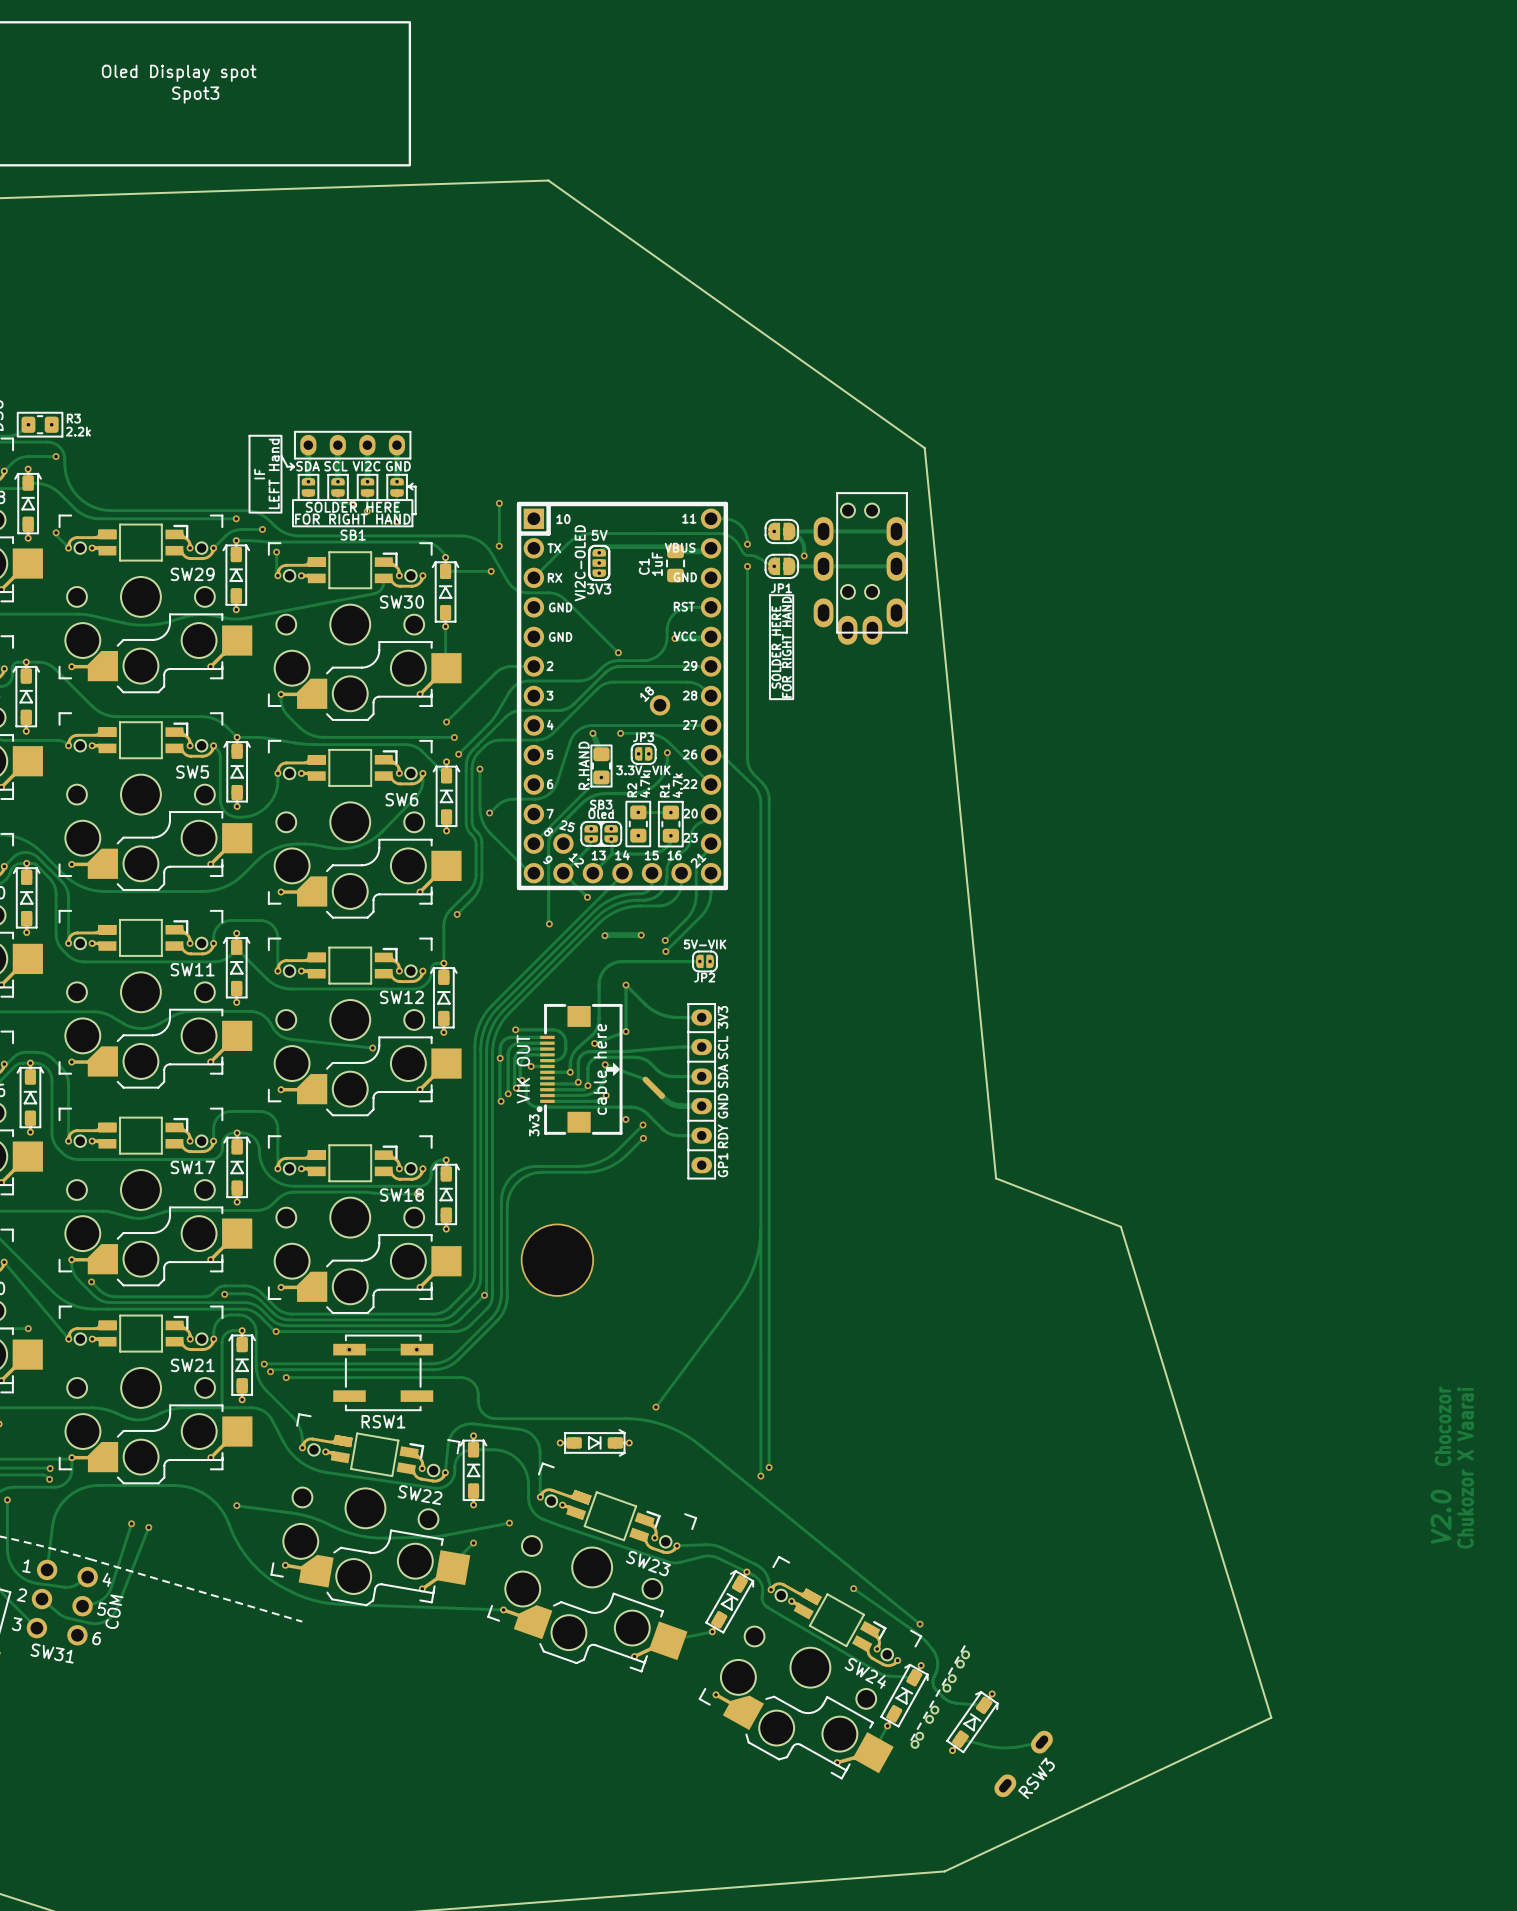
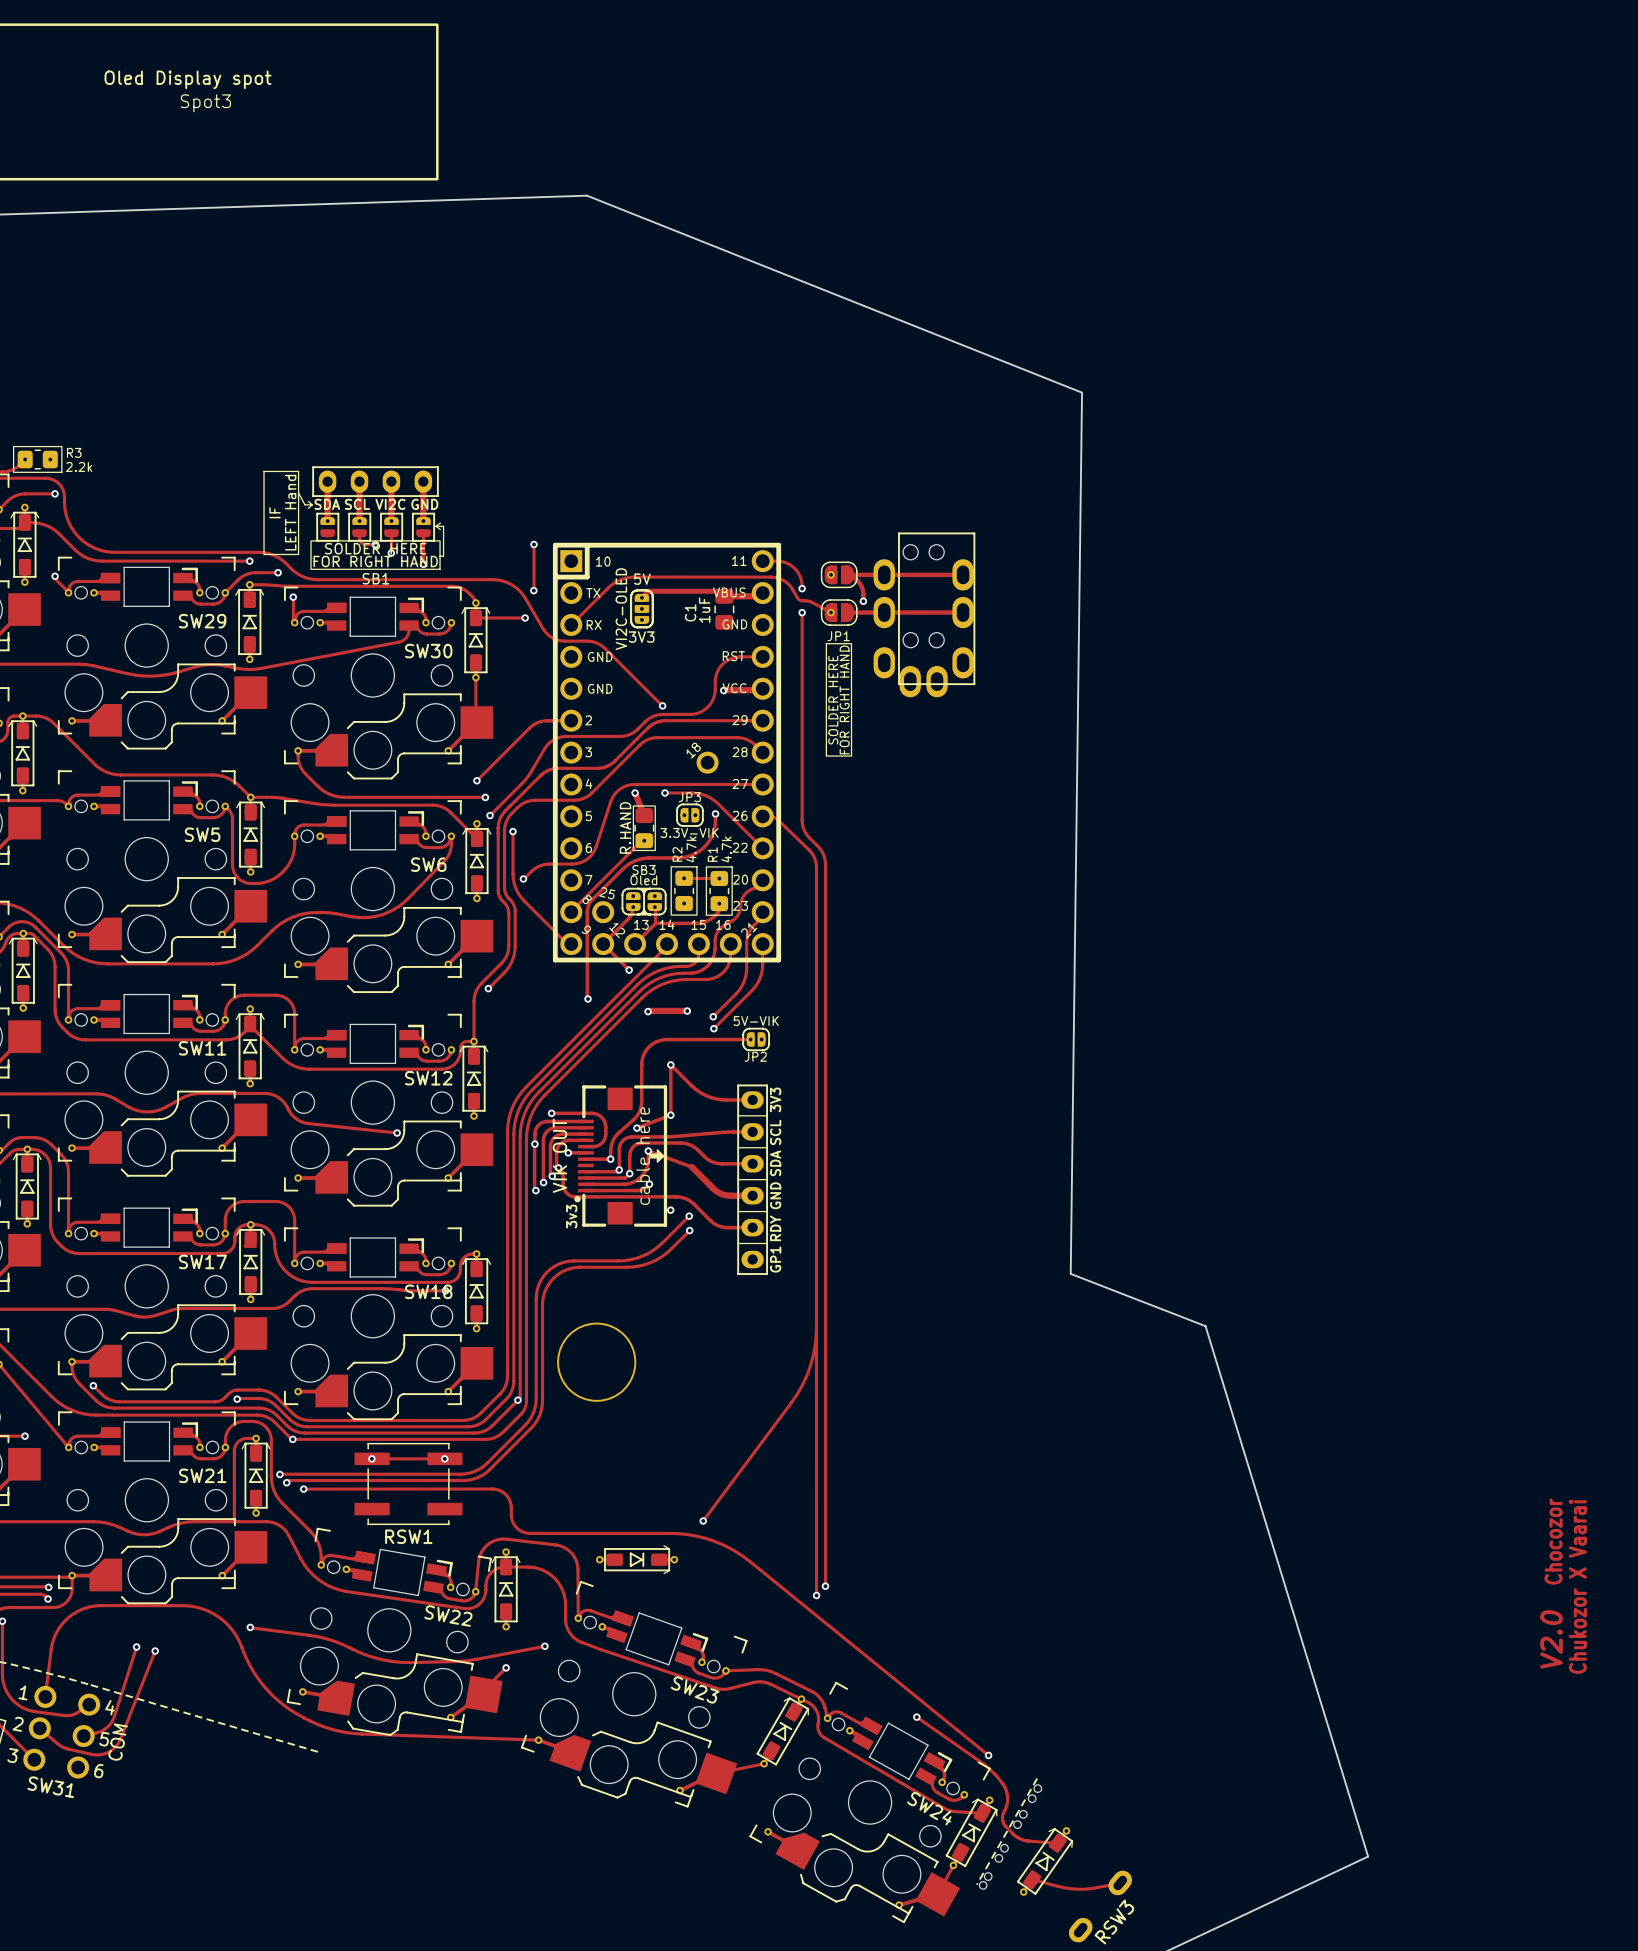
board edge: (548, 180) (924, 448) (996, 1178) -> (587, 195) (1082, 392) (1070, 1273)

